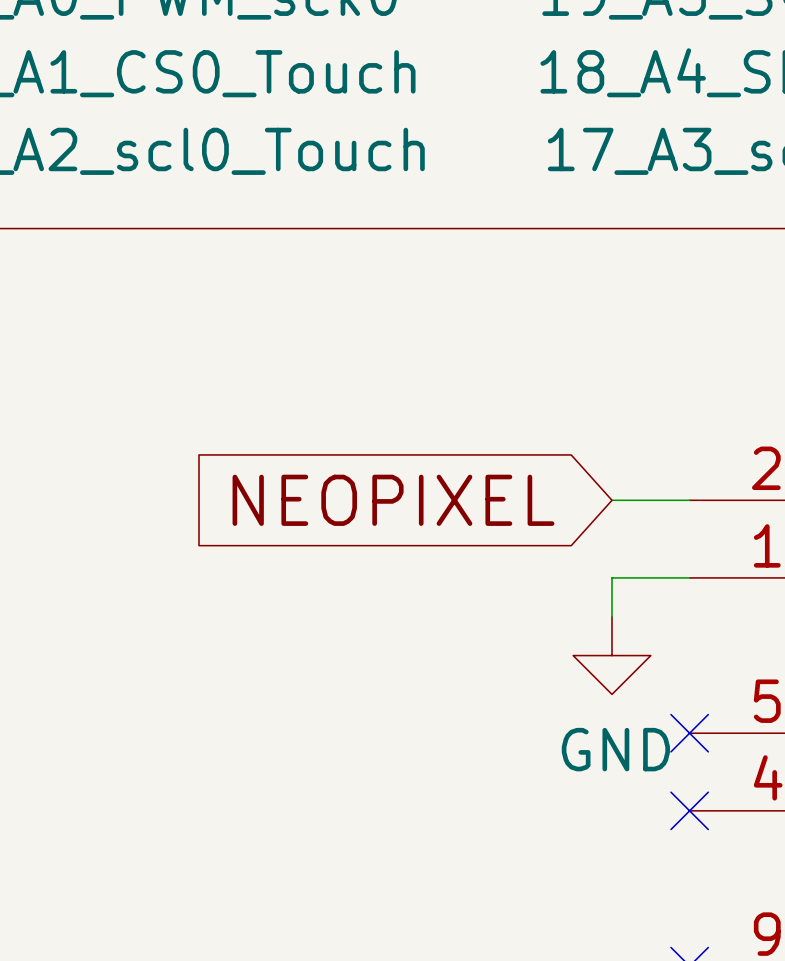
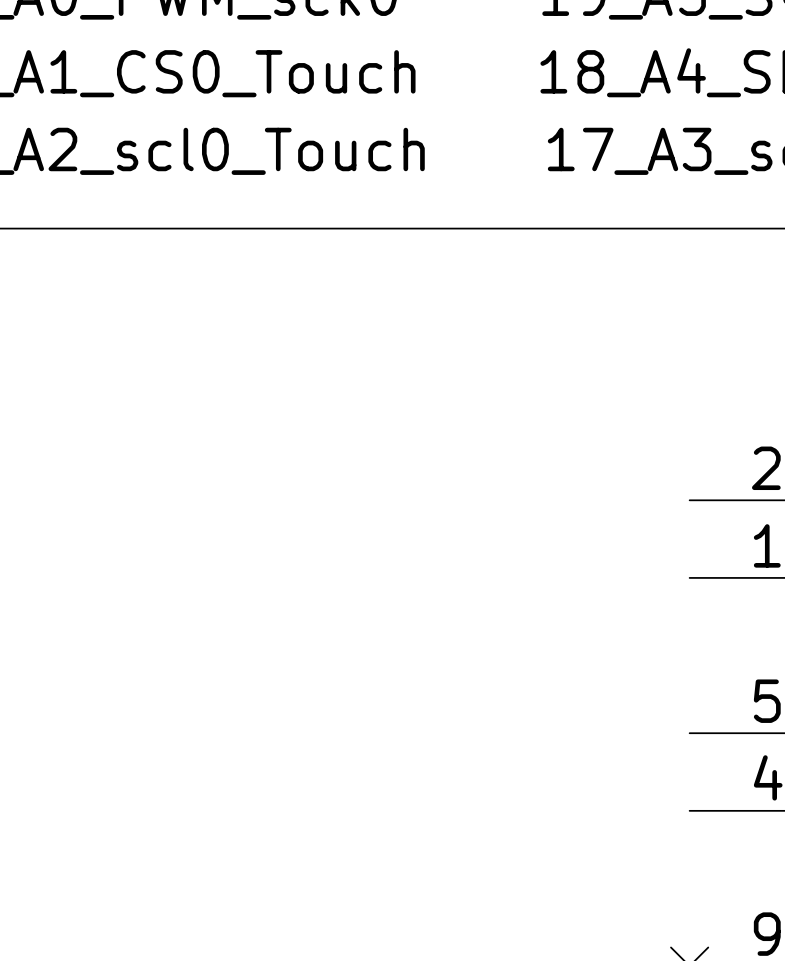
global label: NEOPIXEL (393, 500) -> none
wire: (612, 500) (689, 500) -> none
wire: (689, 577) (612, 577) (612, 616) -> none
power symbol: GND (612, 655) -> none
no-connect mark: (689, 733) -> none
no-connect mark: (689, 810) -> none

